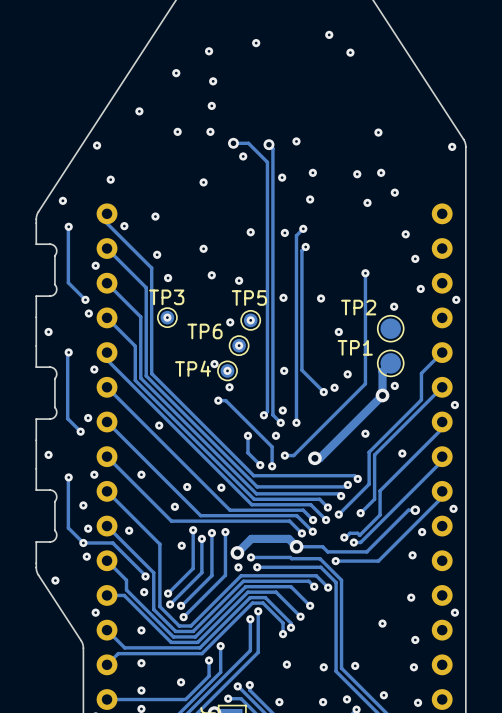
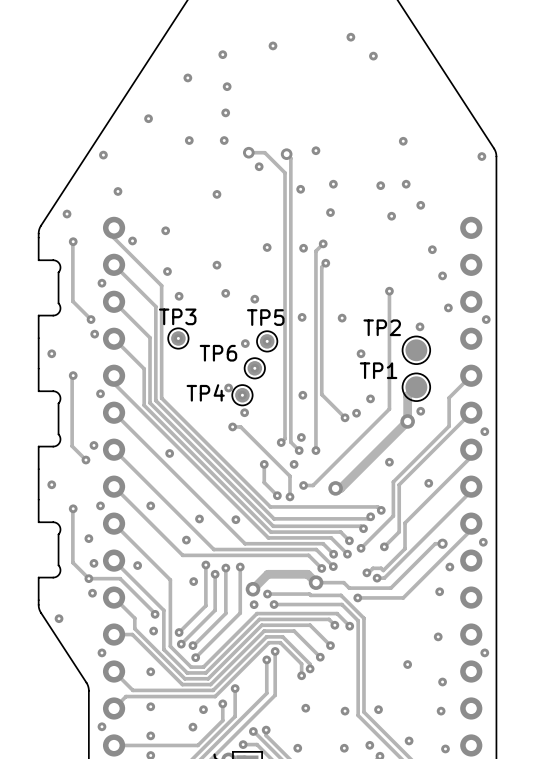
via: none -> (203, 709)
via: none -> (101, 726)

